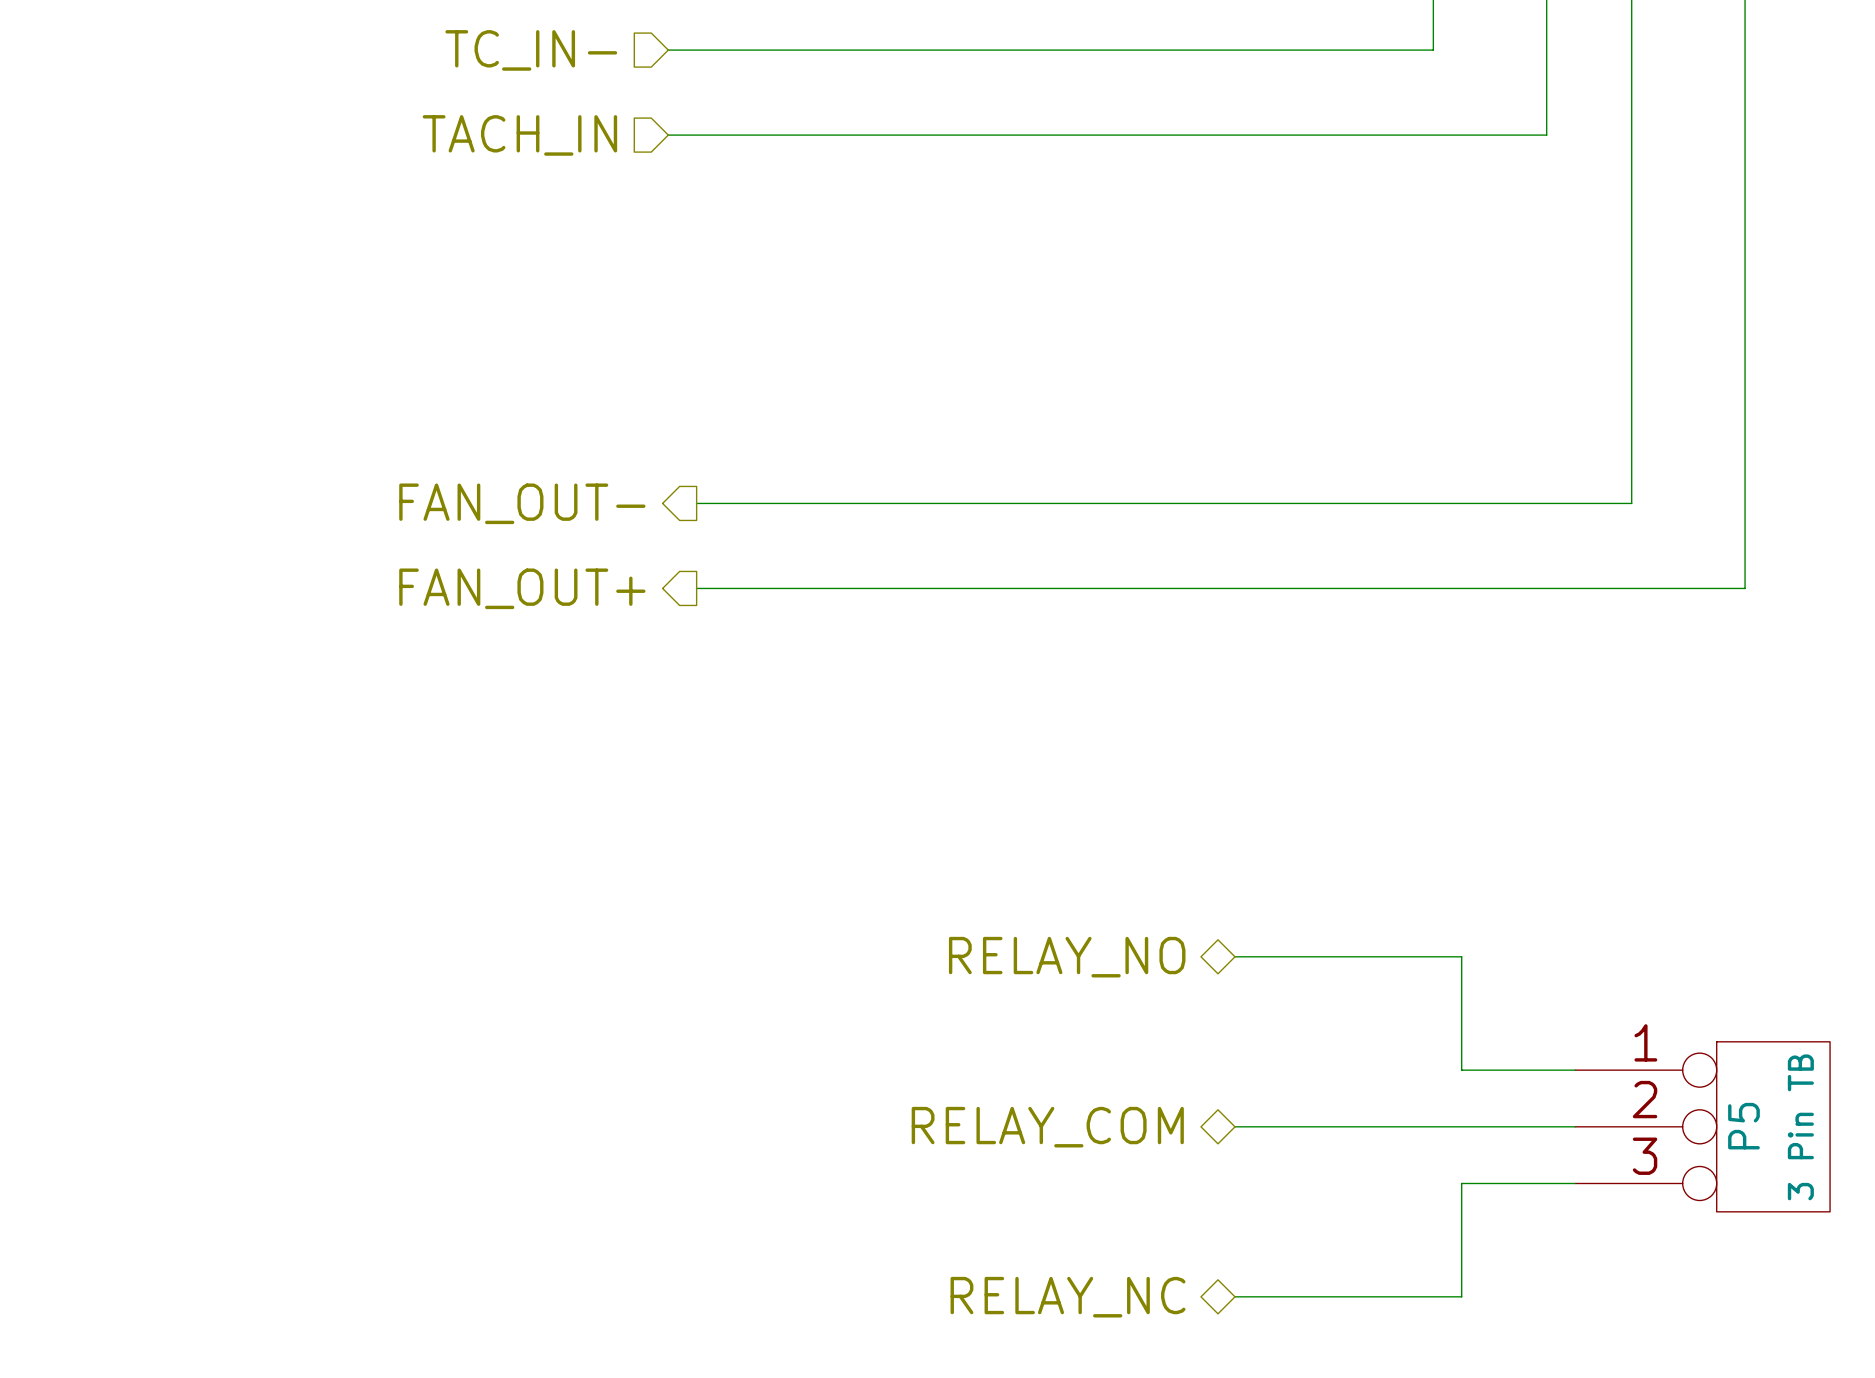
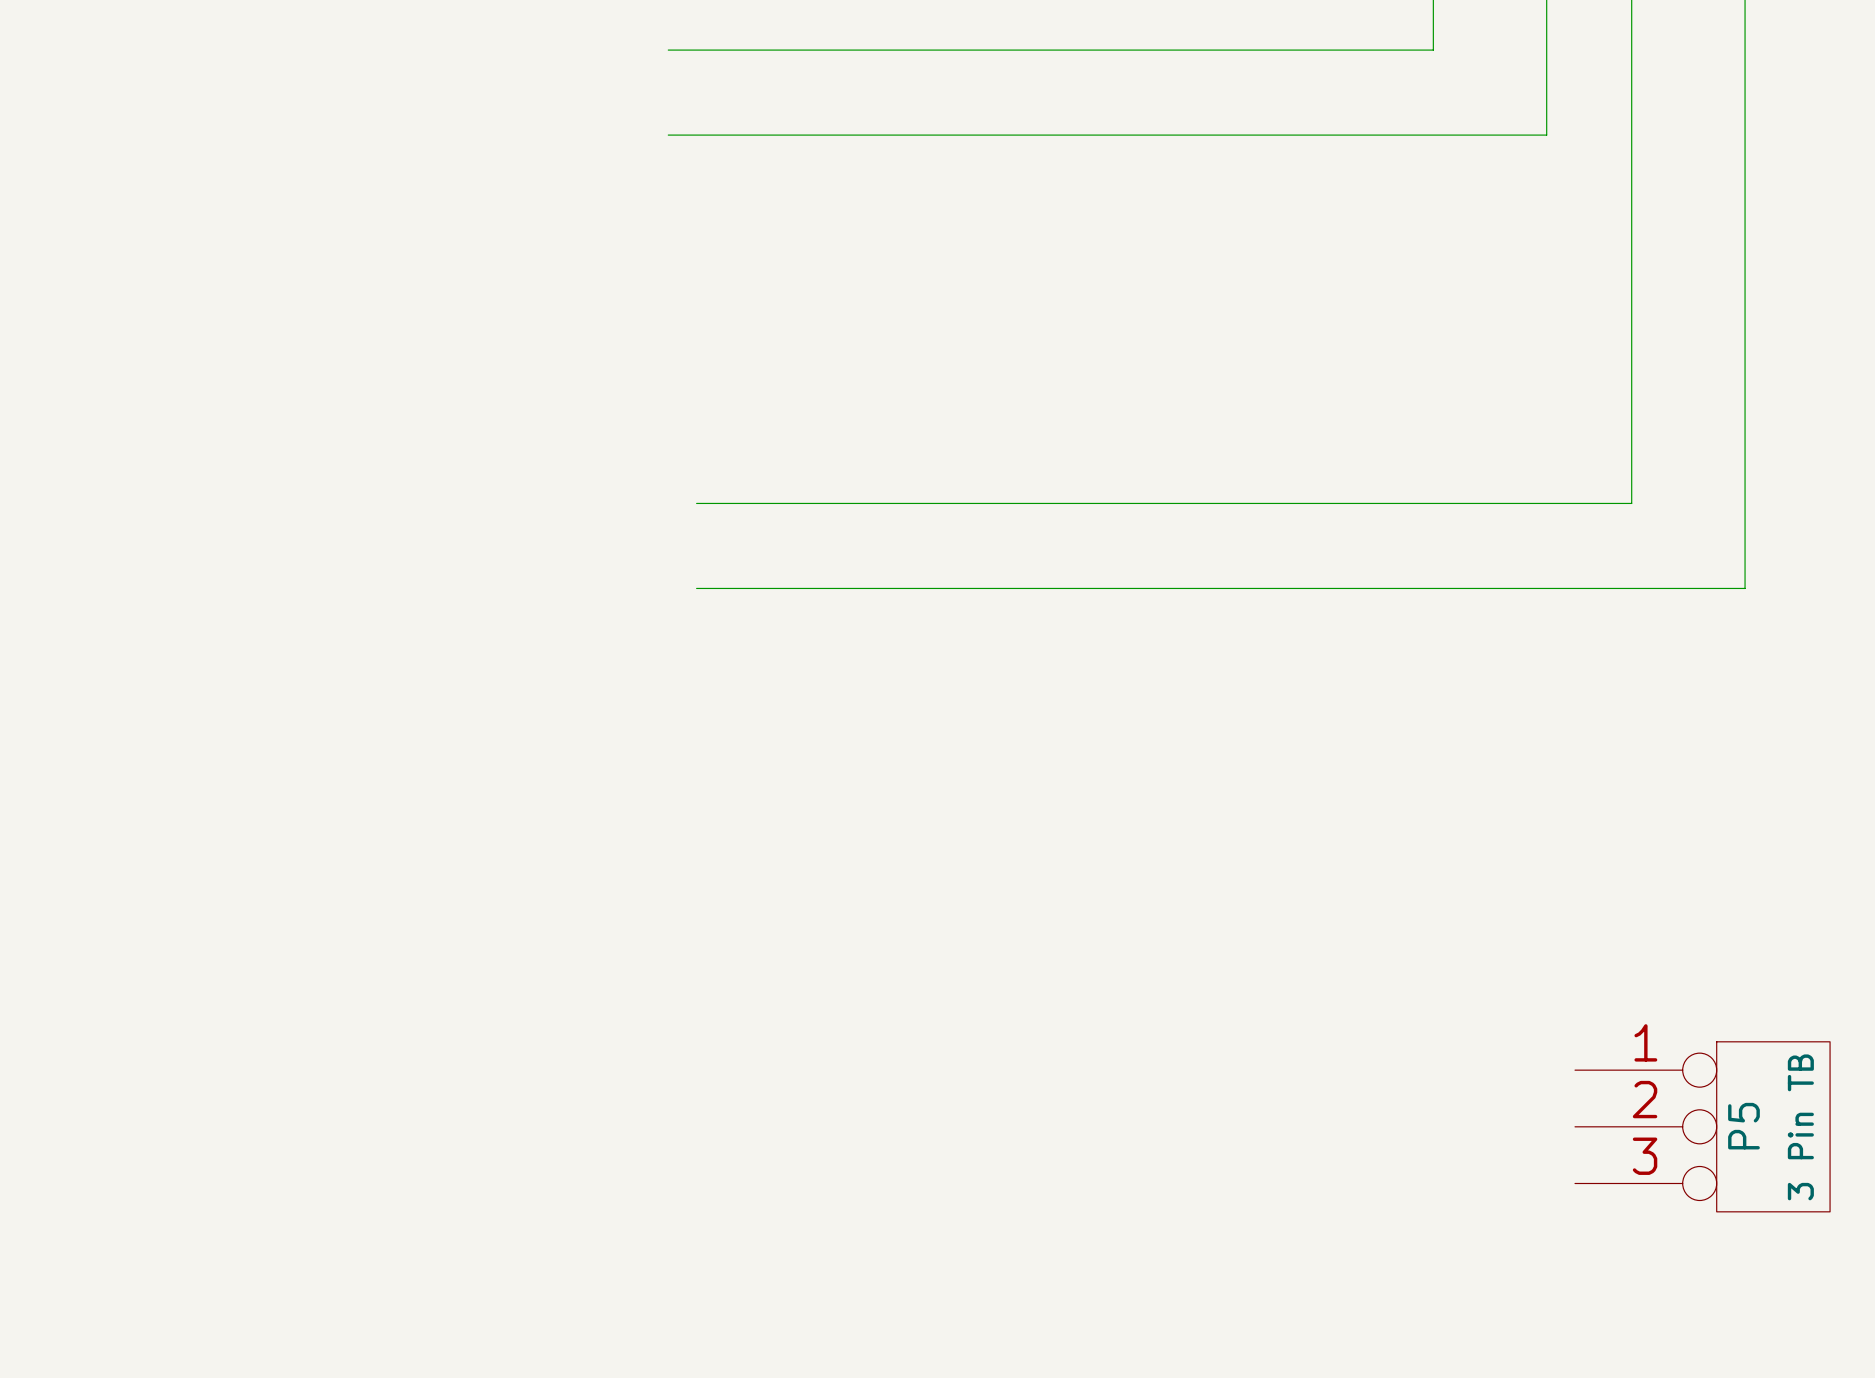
hierarchical label: TC_IN- (531, 50) -> none
hierarchical label: TACH_IN (519, 135) -> none
hierarchical label: FAN_OUT- (522, 503) -> none
hierarchical label: FAN_OUT+ (522, 588) -> none
wire: (1235, 956) (1461, 956) (1461, 1070) (1575, 1070) -> none
hierarchical label: RELAY_NO (1067, 957) -> none
wire: (1235, 1126) (1575, 1126) -> none
hierarchical label: RELAY_COM (1047, 1127) -> none
wire: (1575, 1183) (1461, 1183) (1461, 1296) (1235, 1296) -> none
hierarchical label: RELAY_NC (1068, 1297) -> none

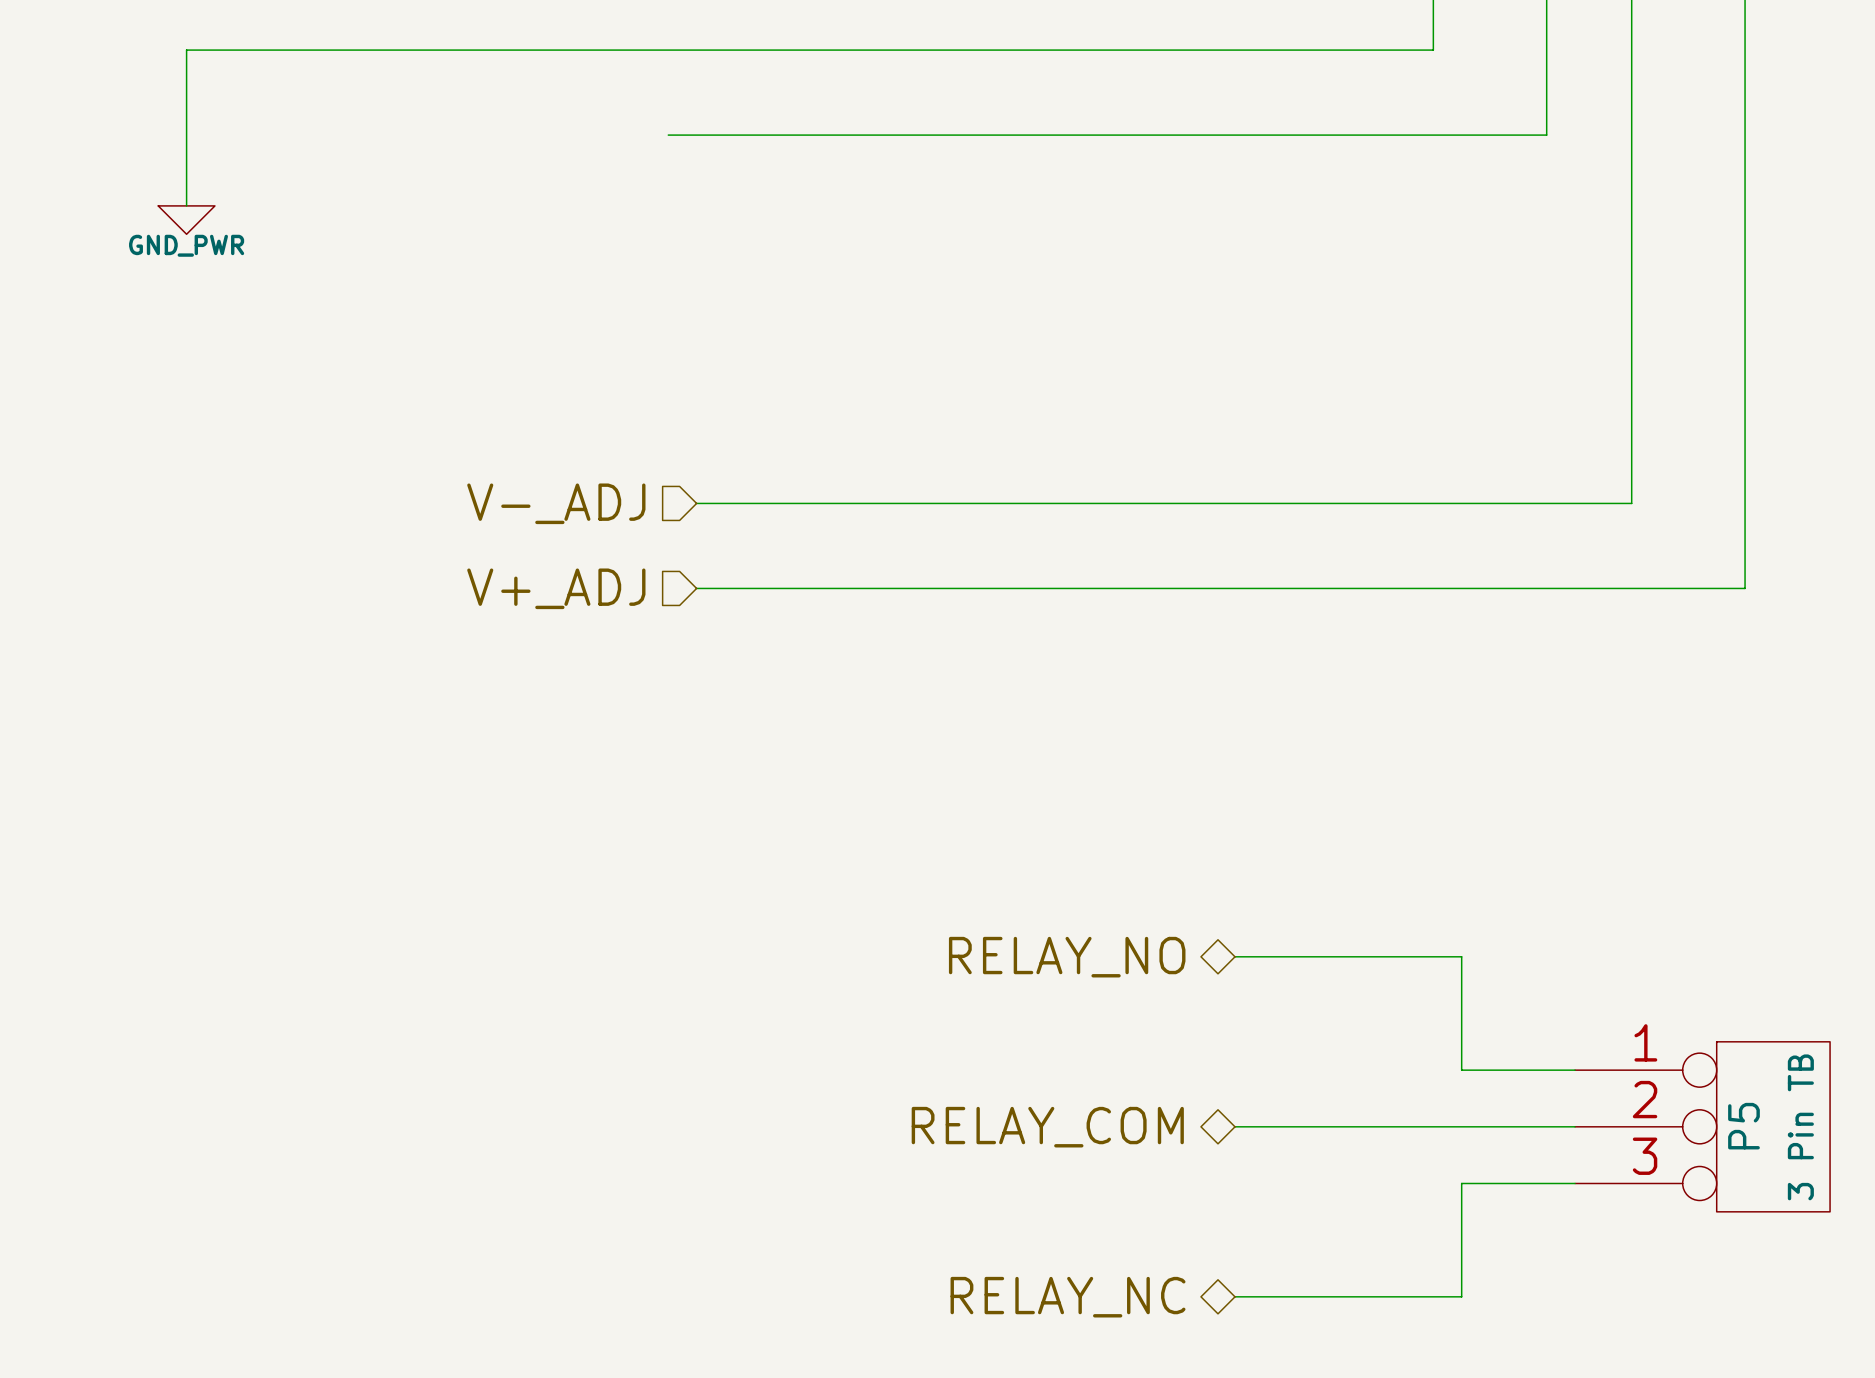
wire: none -> (668, 50) (186, 50) (186, 205)
power symbol: none -> GND_PWR (186, 220)
hierarchical label: none -> V-_ADJ (556, 503)
hierarchical label: none -> V+_ADJ (556, 588)
wire: none -> (1235, 956) (1461, 956) (1461, 1070) (1575, 1070)
hierarchical label: none -> RELAY_NO (1067, 957)
wire: none -> (1235, 1126) (1575, 1126)
hierarchical label: none -> RELAY_COM (1047, 1127)
wire: none -> (1575, 1183) (1461, 1183) (1461, 1296) (1235, 1296)
hierarchical label: none -> RELAY_NC (1068, 1297)

